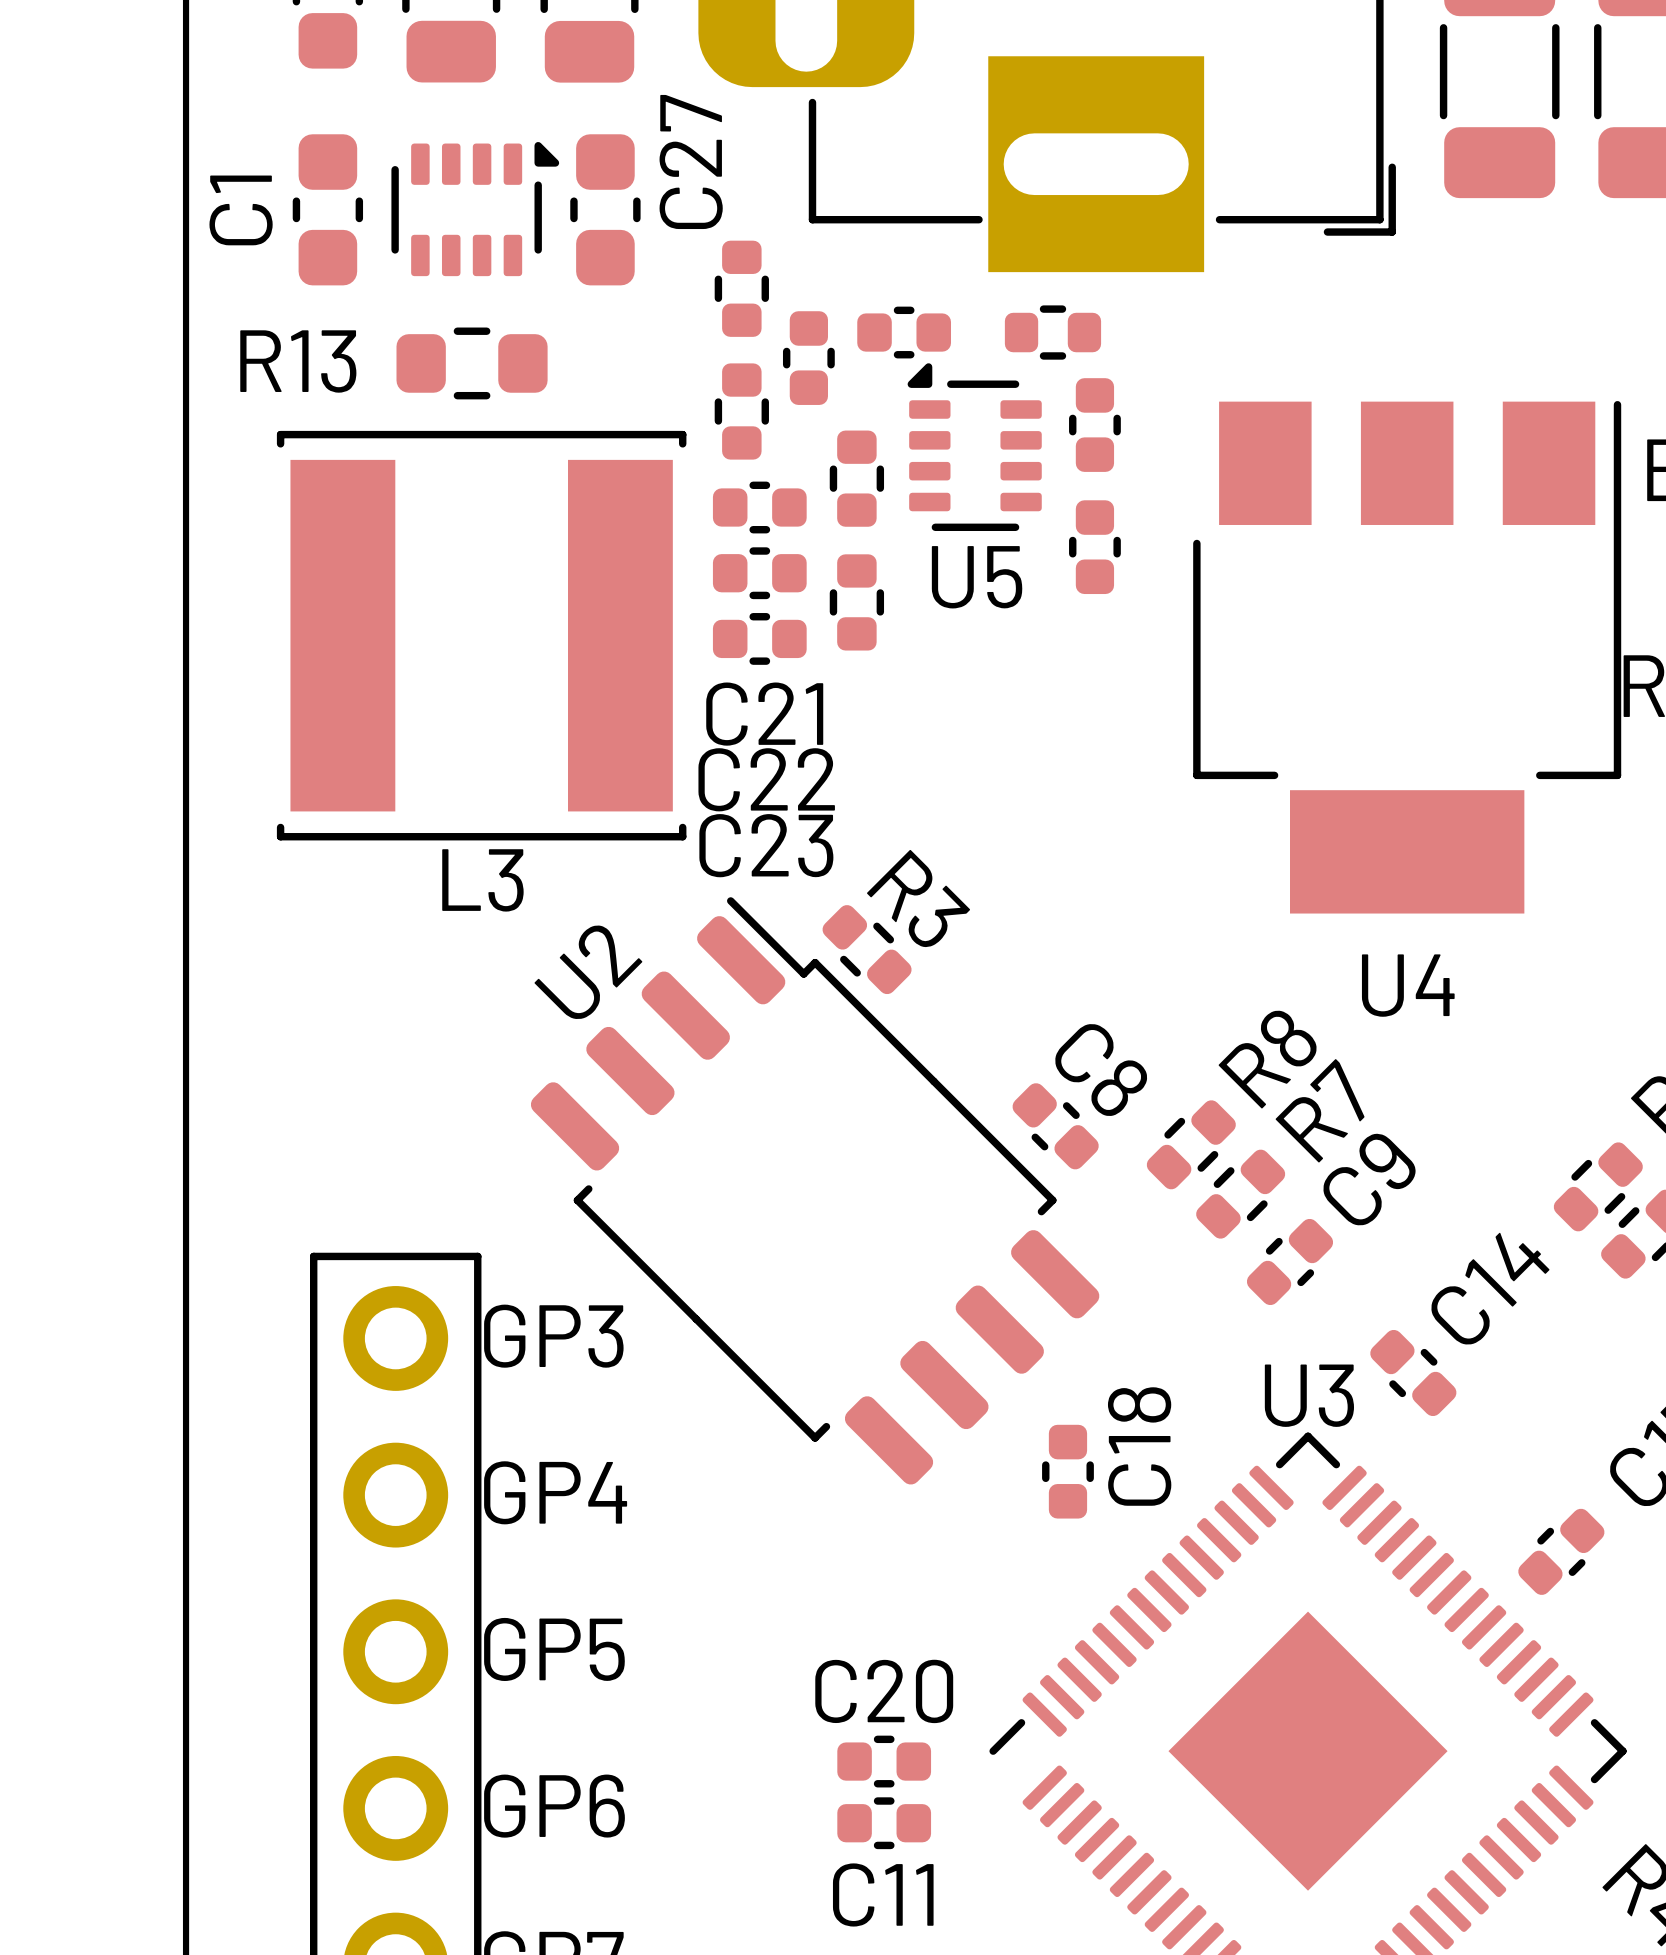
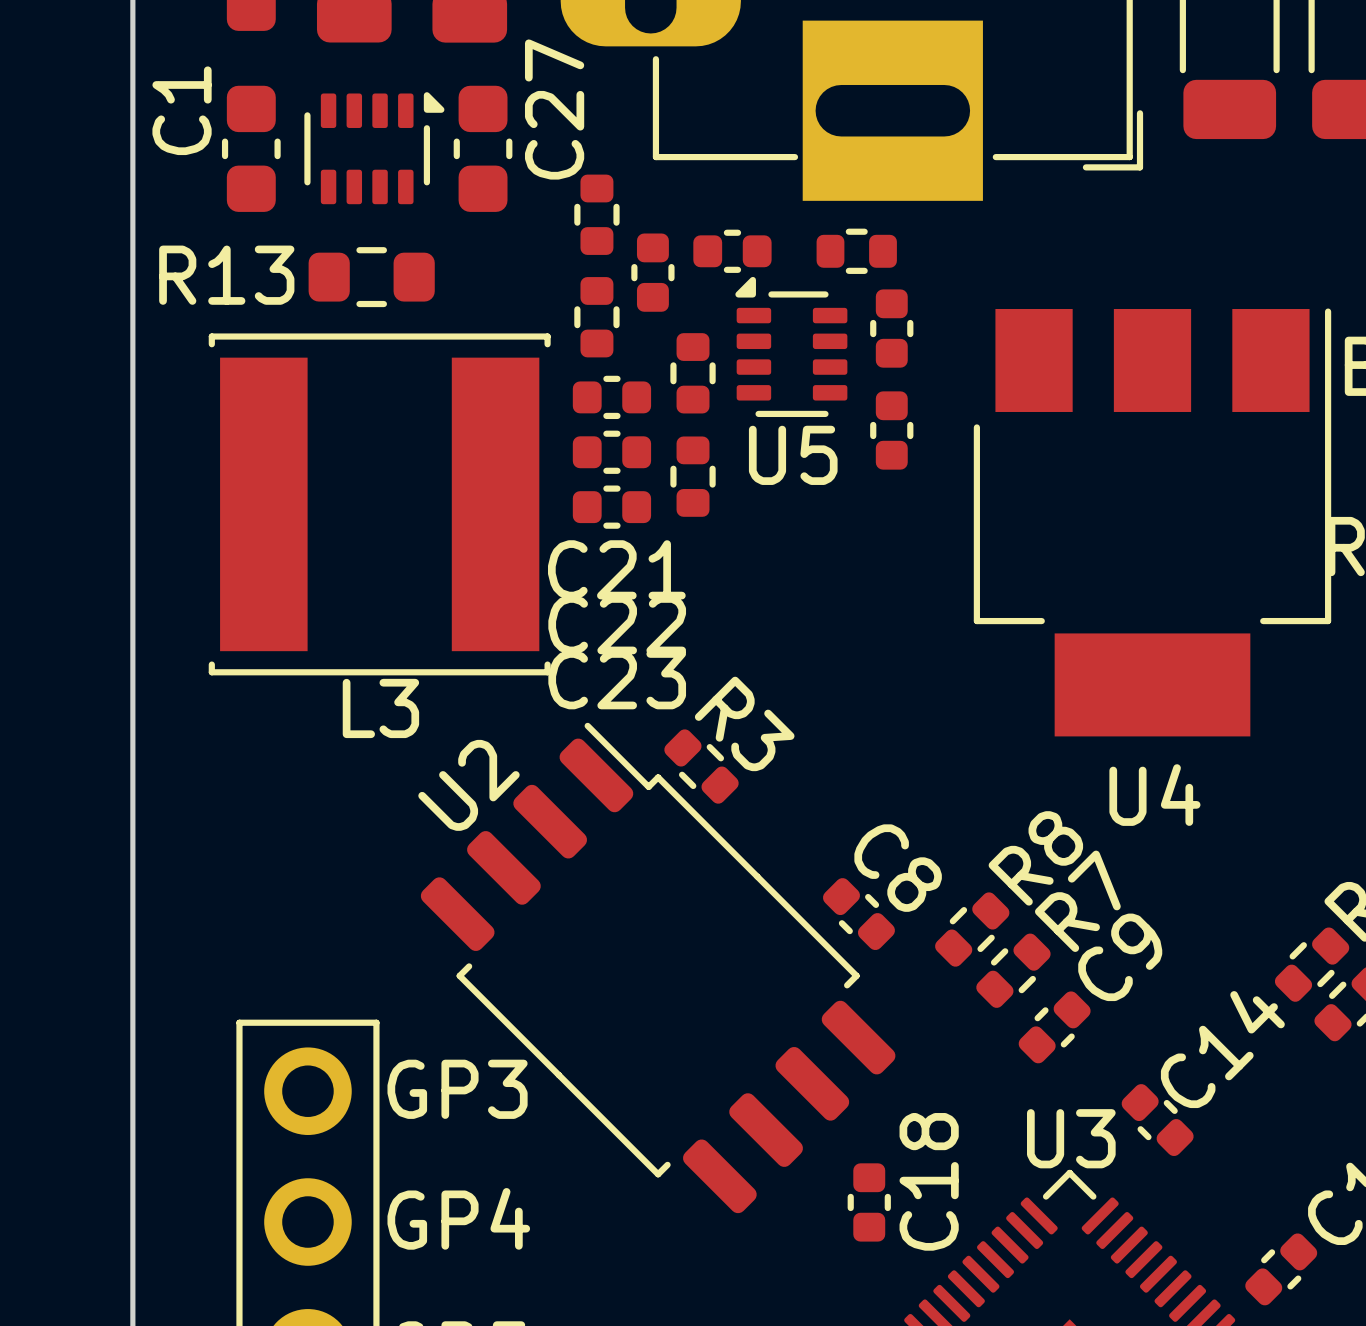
C1 name position: C1 (241, 210) -> C1 (182, 110)

